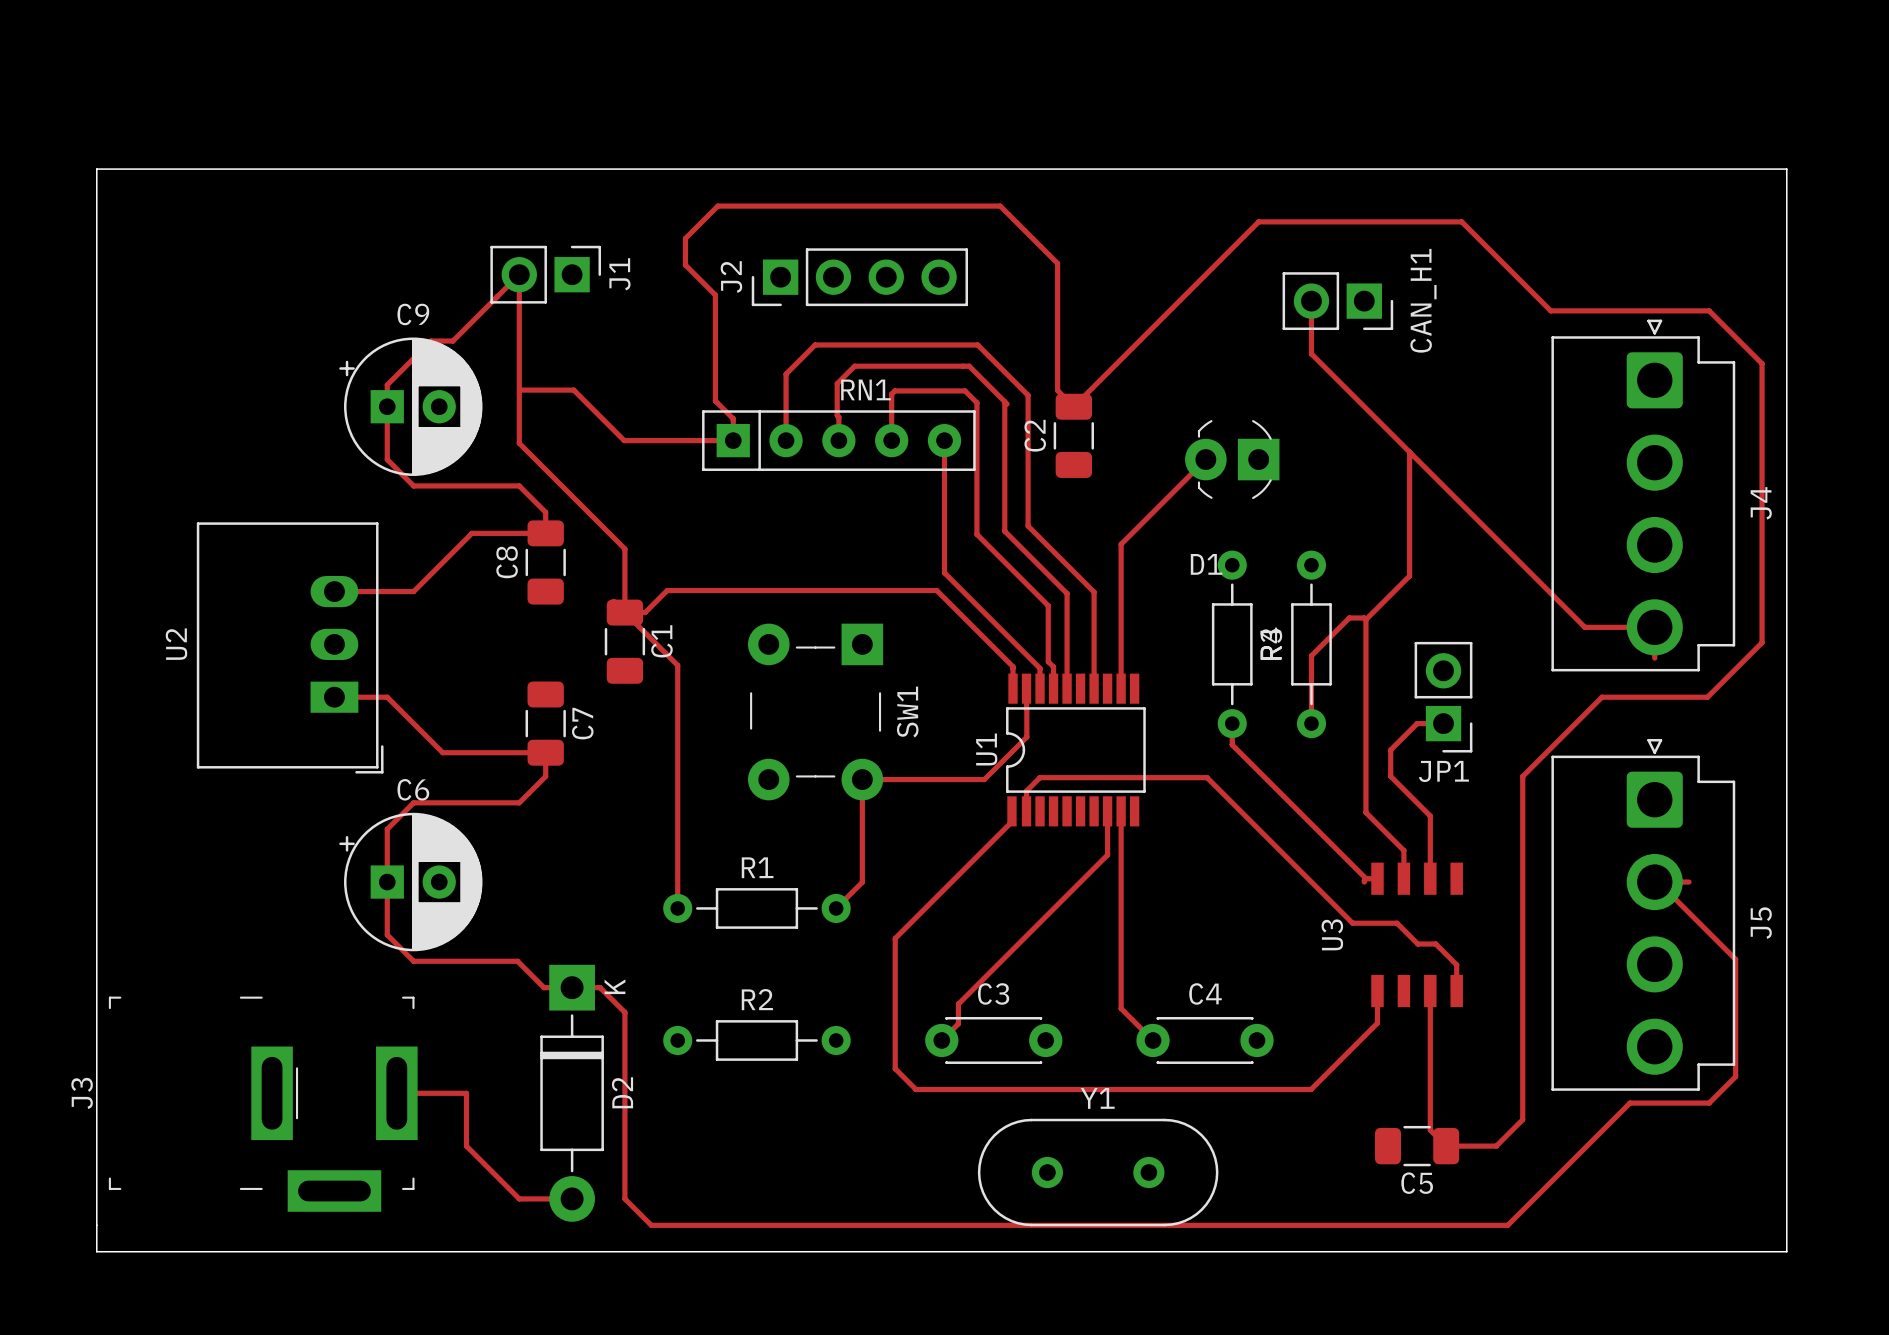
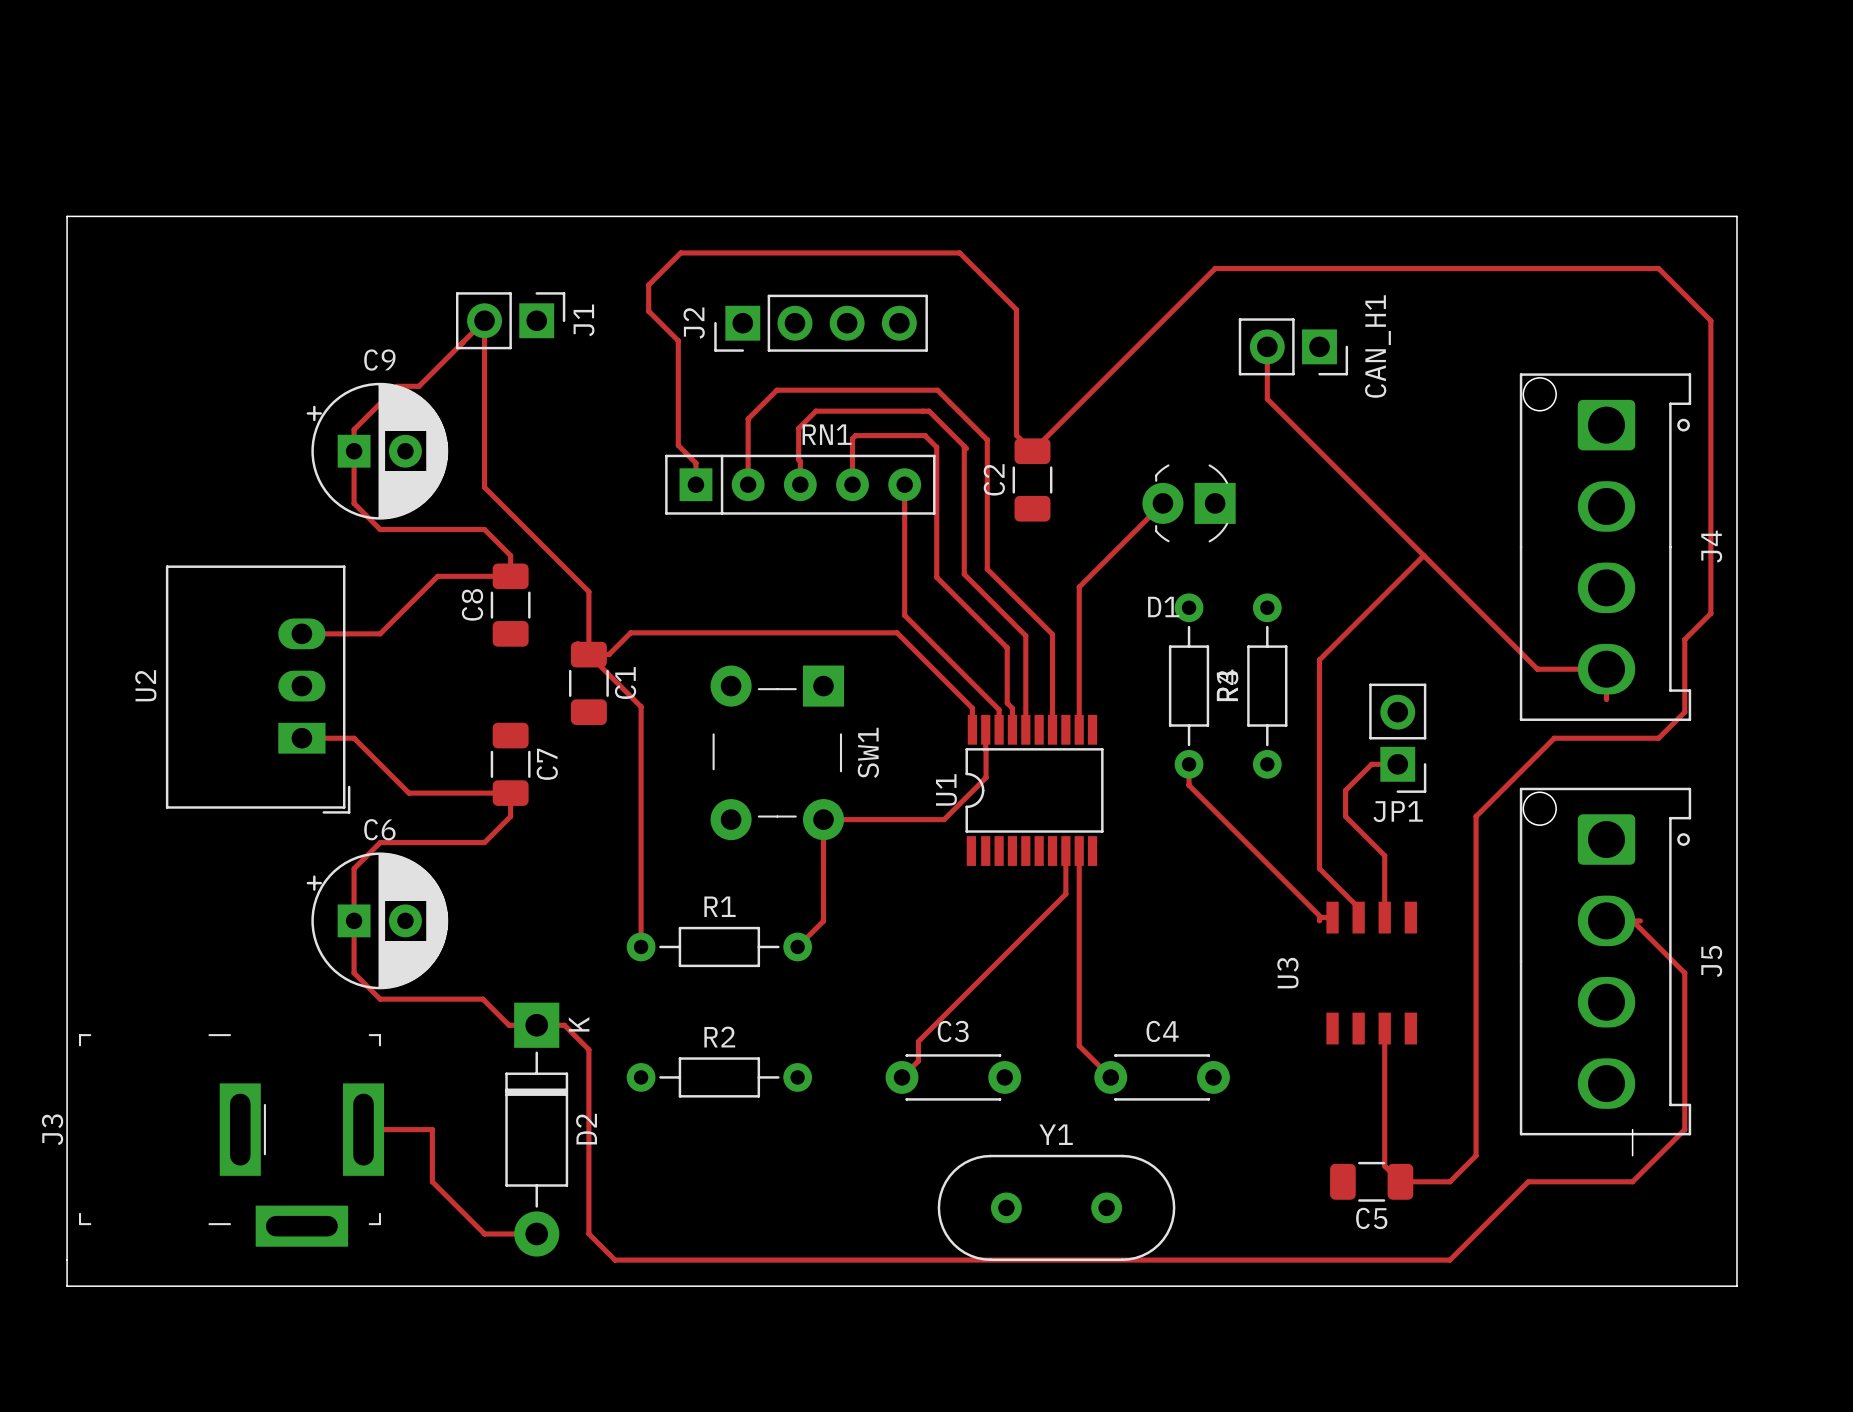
track: (1461, 221) (1550, 310) (1709, 310) (1762, 363) (1762, 642) (1733, 670) -> (1415, 268) (1658, 268) (1710, 320) (1710, 613) (1684, 639) (1684, 712)
J4 footprint: [1551, 319, 1736, 672] -> [1519, 373, 1692, 721]
track: (520, 390) (573, 390) (624, 440) (733, 440) -> none
track: (1409, 452) (1409, 575) (1365, 619) -> none
track: (1365, 619) (1365, 812) (1403, 850) (1403, 868) -> (1423, 555) (1319, 659) (1319, 868) (1358, 907)
track: (1365, 619) (1349, 617) (1311, 655) (1311, 723) -> none
J5 footprint: [1551, 738, 1736, 1091] -> [1519, 787, 1692, 1136]
track: (1011, 811) (1011, 821) (895, 938) (895, 1068) (916, 1089) (1311, 1089) (1377, 1023) (1377, 990) -> none
track: (1026, 811) (1026, 791) (1039, 777) (1207, 777) (1352, 923) (1397, 923) (1417, 944) (1435, 944) (1456, 964) (1456, 990) -> none
track: (1658, 882) (1735, 959) (1735, 1076) (1709, 1103) (1630, 1103) (1507, 1225) (1496, 1225) -> (1632, 920) (1684, 973) (1684, 1129) (1632, 1181) (1528, 1181) (1449, 1260)
board edge: none -> (1632, 1129) (1632, 1155)

